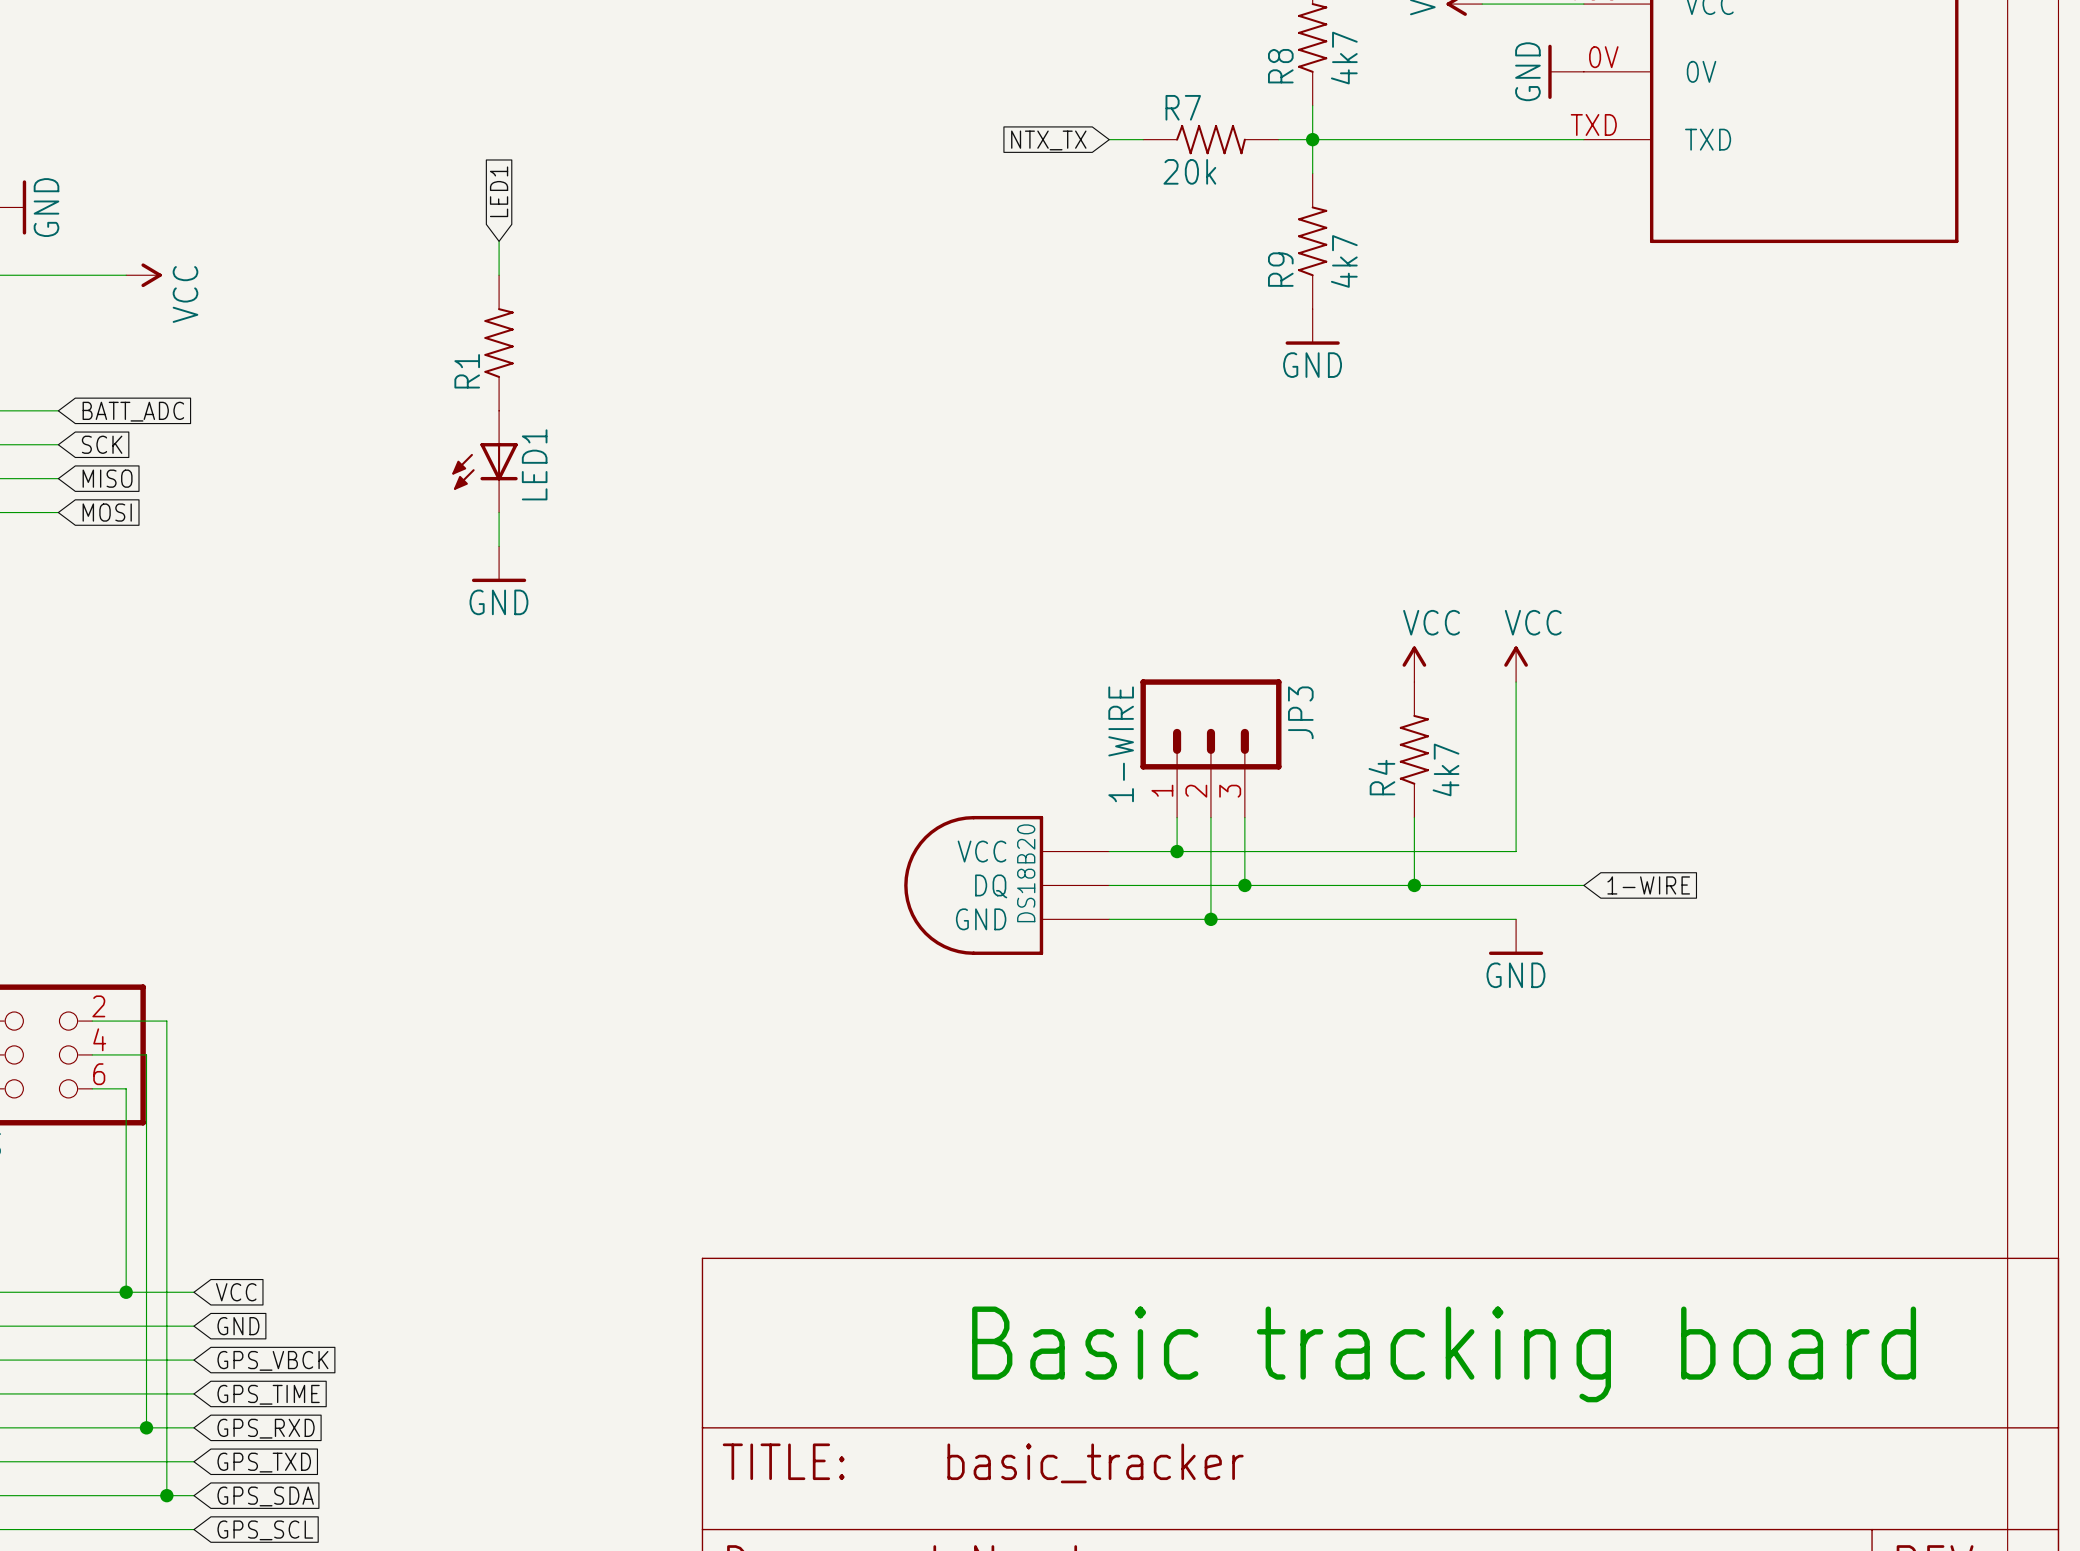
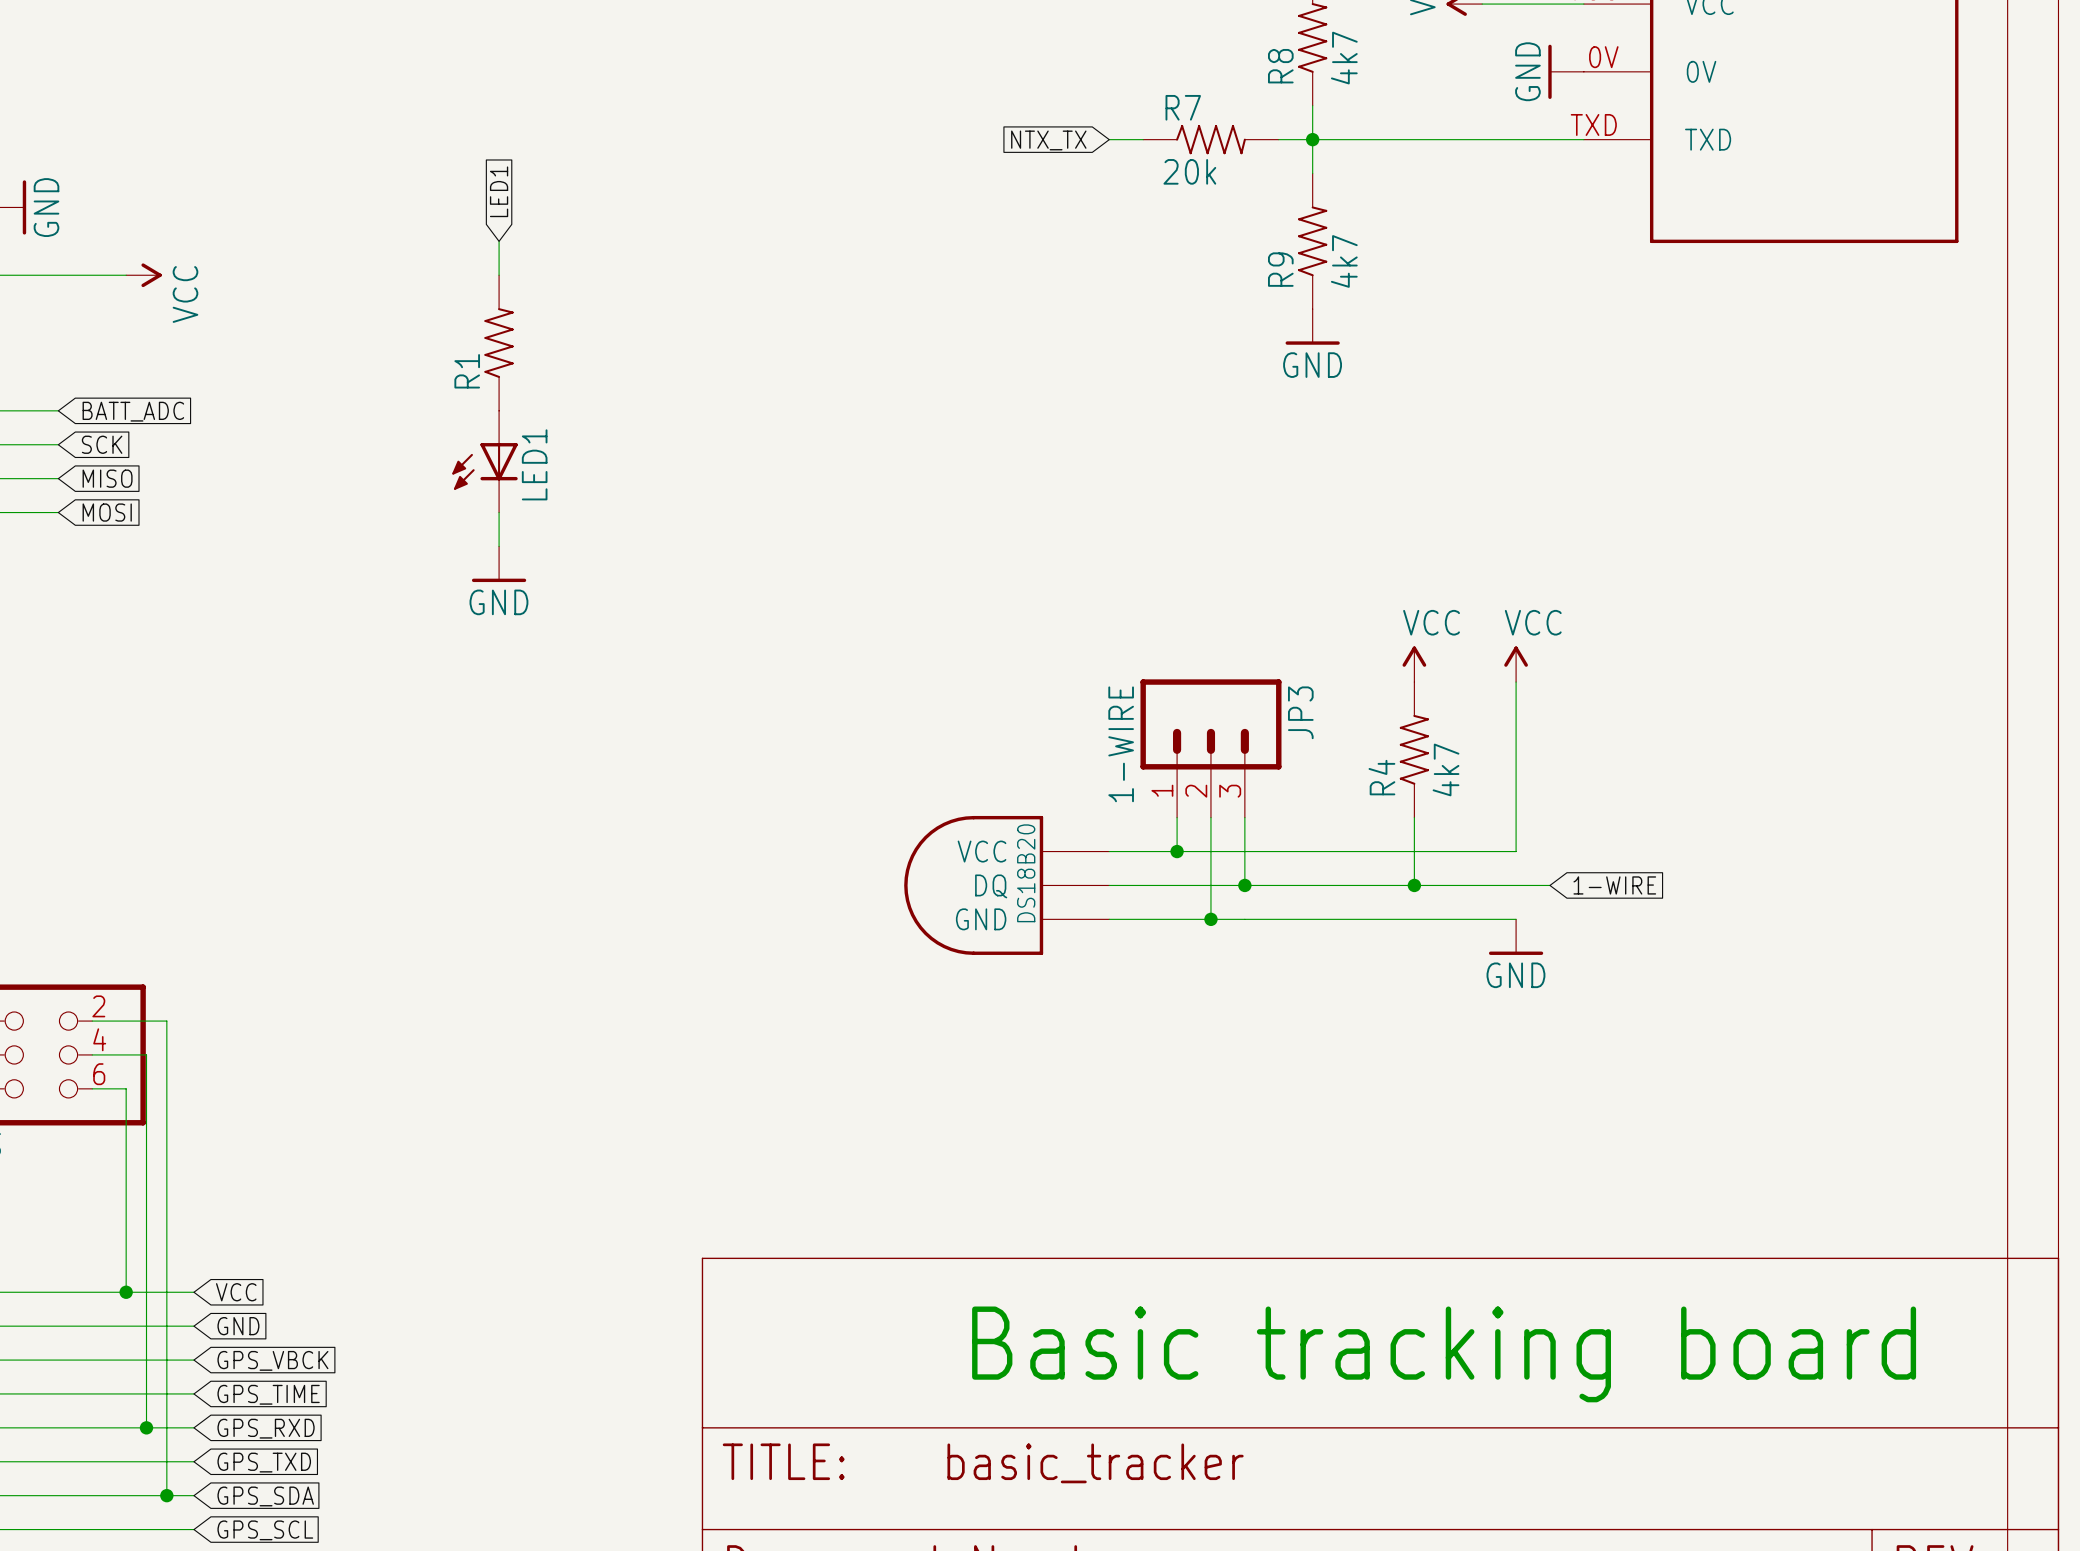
wire: (1549, 885) (1583, 885) -> none
global label position: 1-WIRE (1648, 885) -> 1-WIRE (1614, 885)

